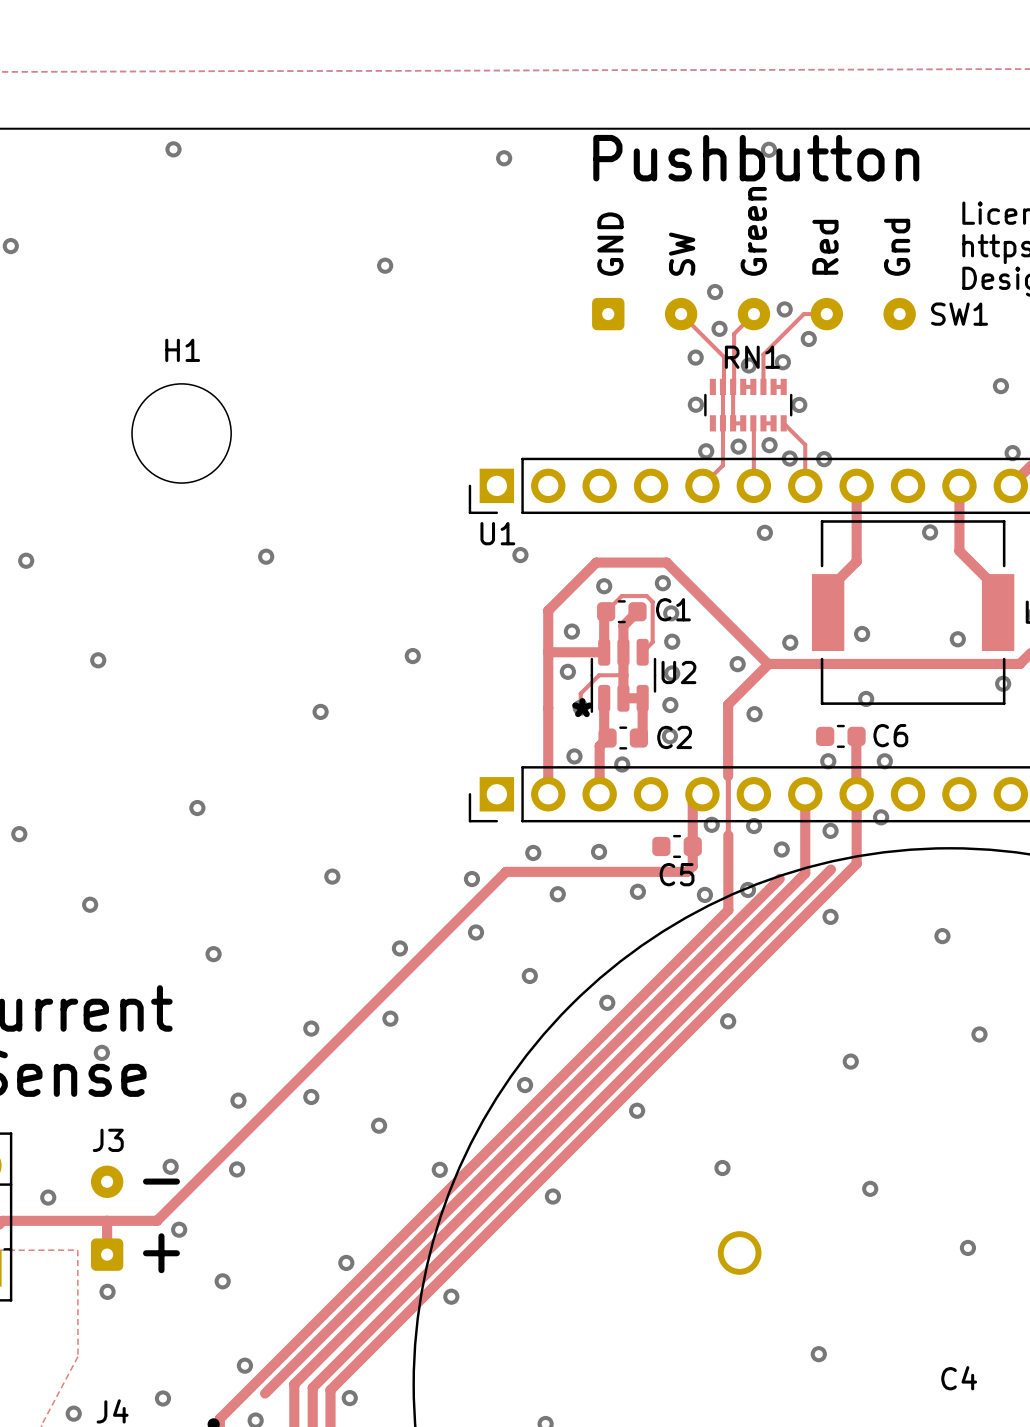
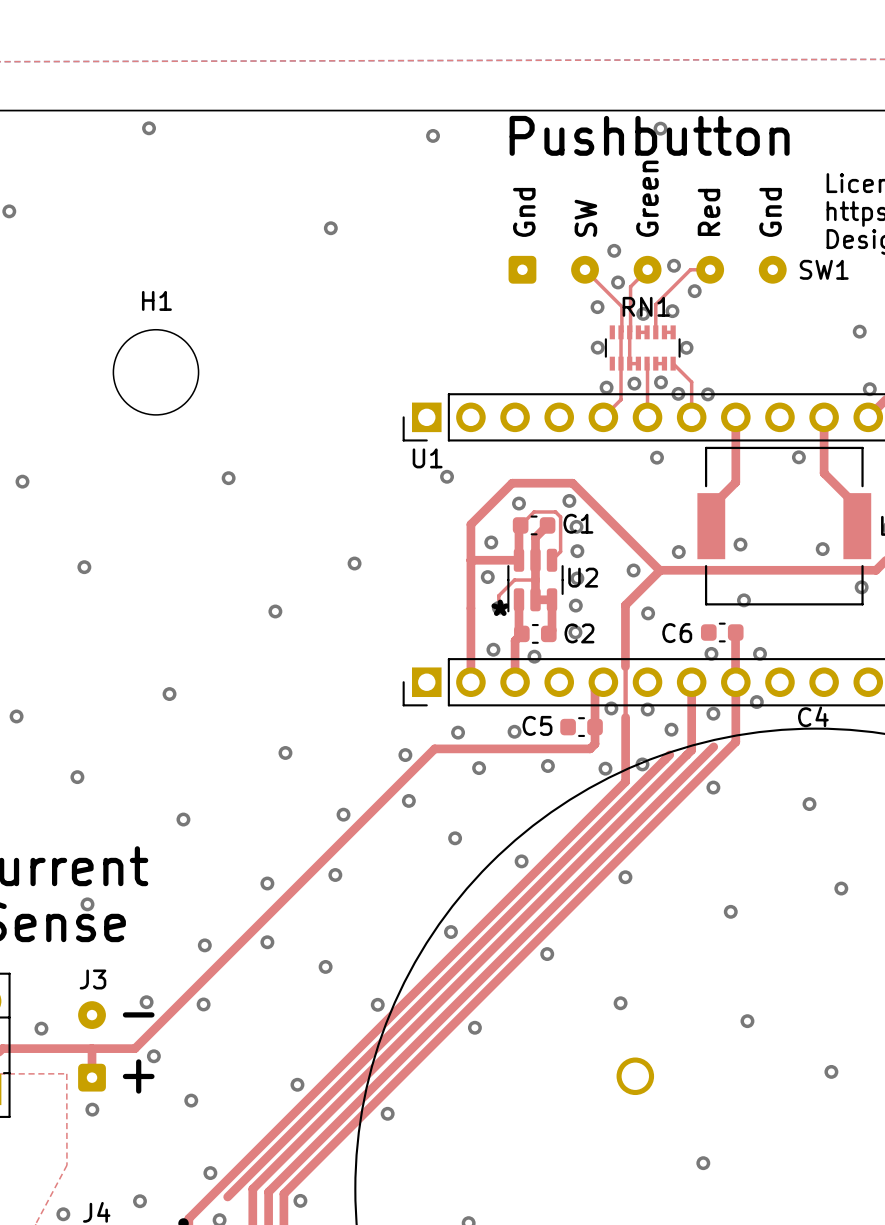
text: GND (610, 244) -> Gnd (524, 212)
C6 name position: C6 (890, 735) -> C6 (677, 633)
C5 name position: C5 (677, 874) -> C5 (537, 725)
C4 name position: C4 (959, 1378) -> C4 (813, 716)

